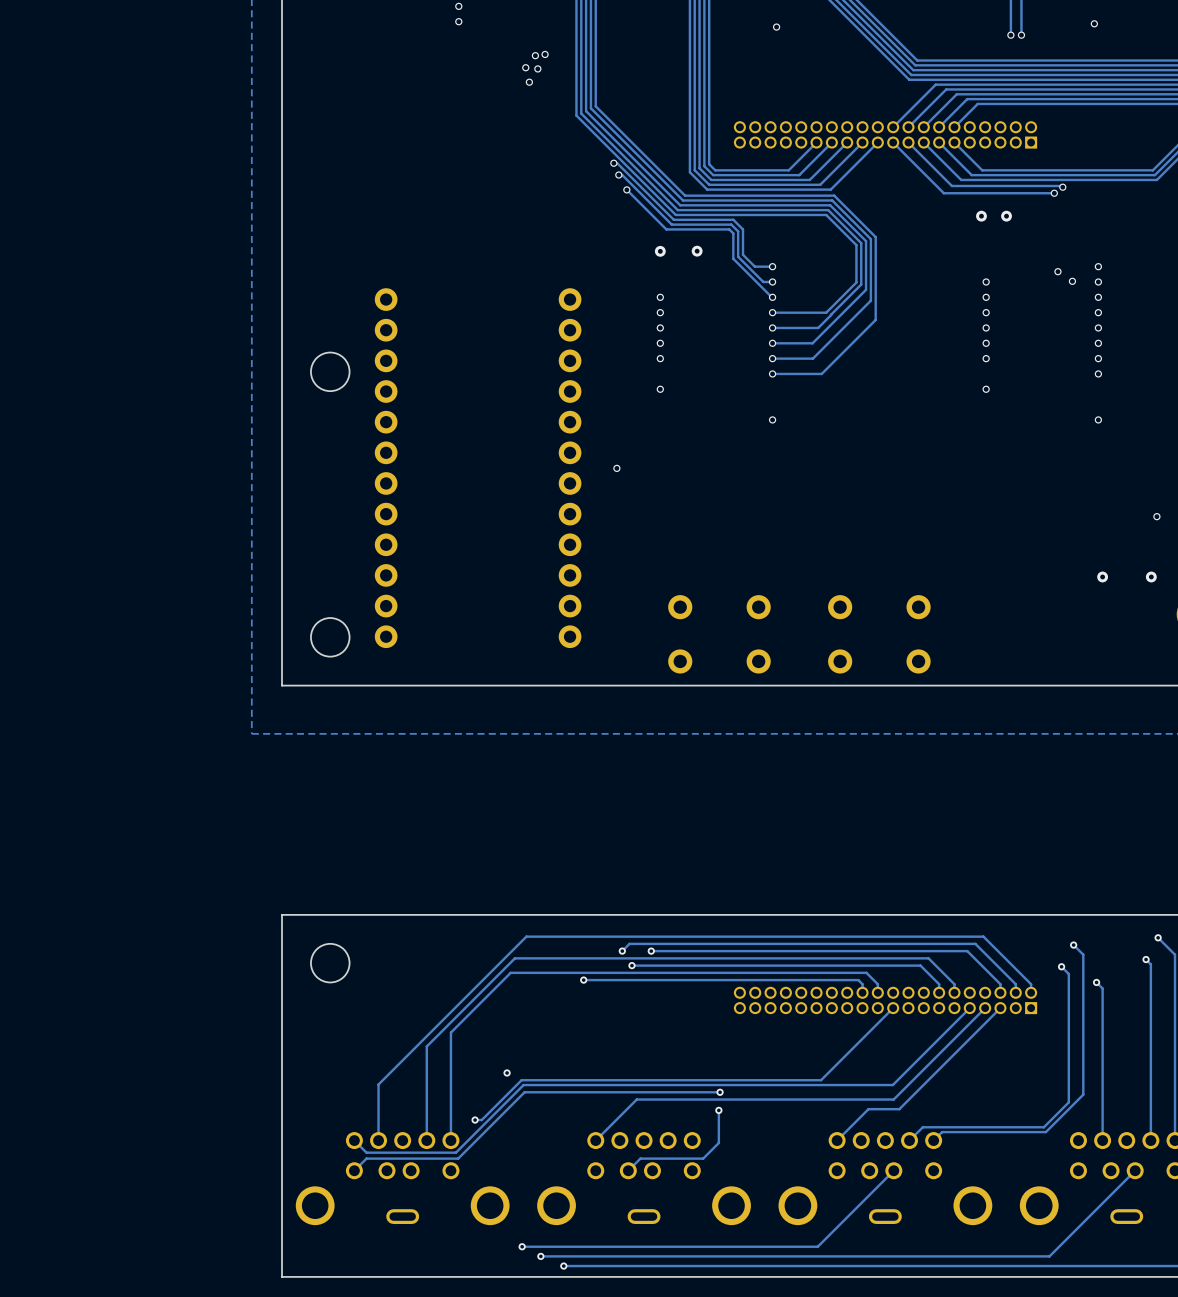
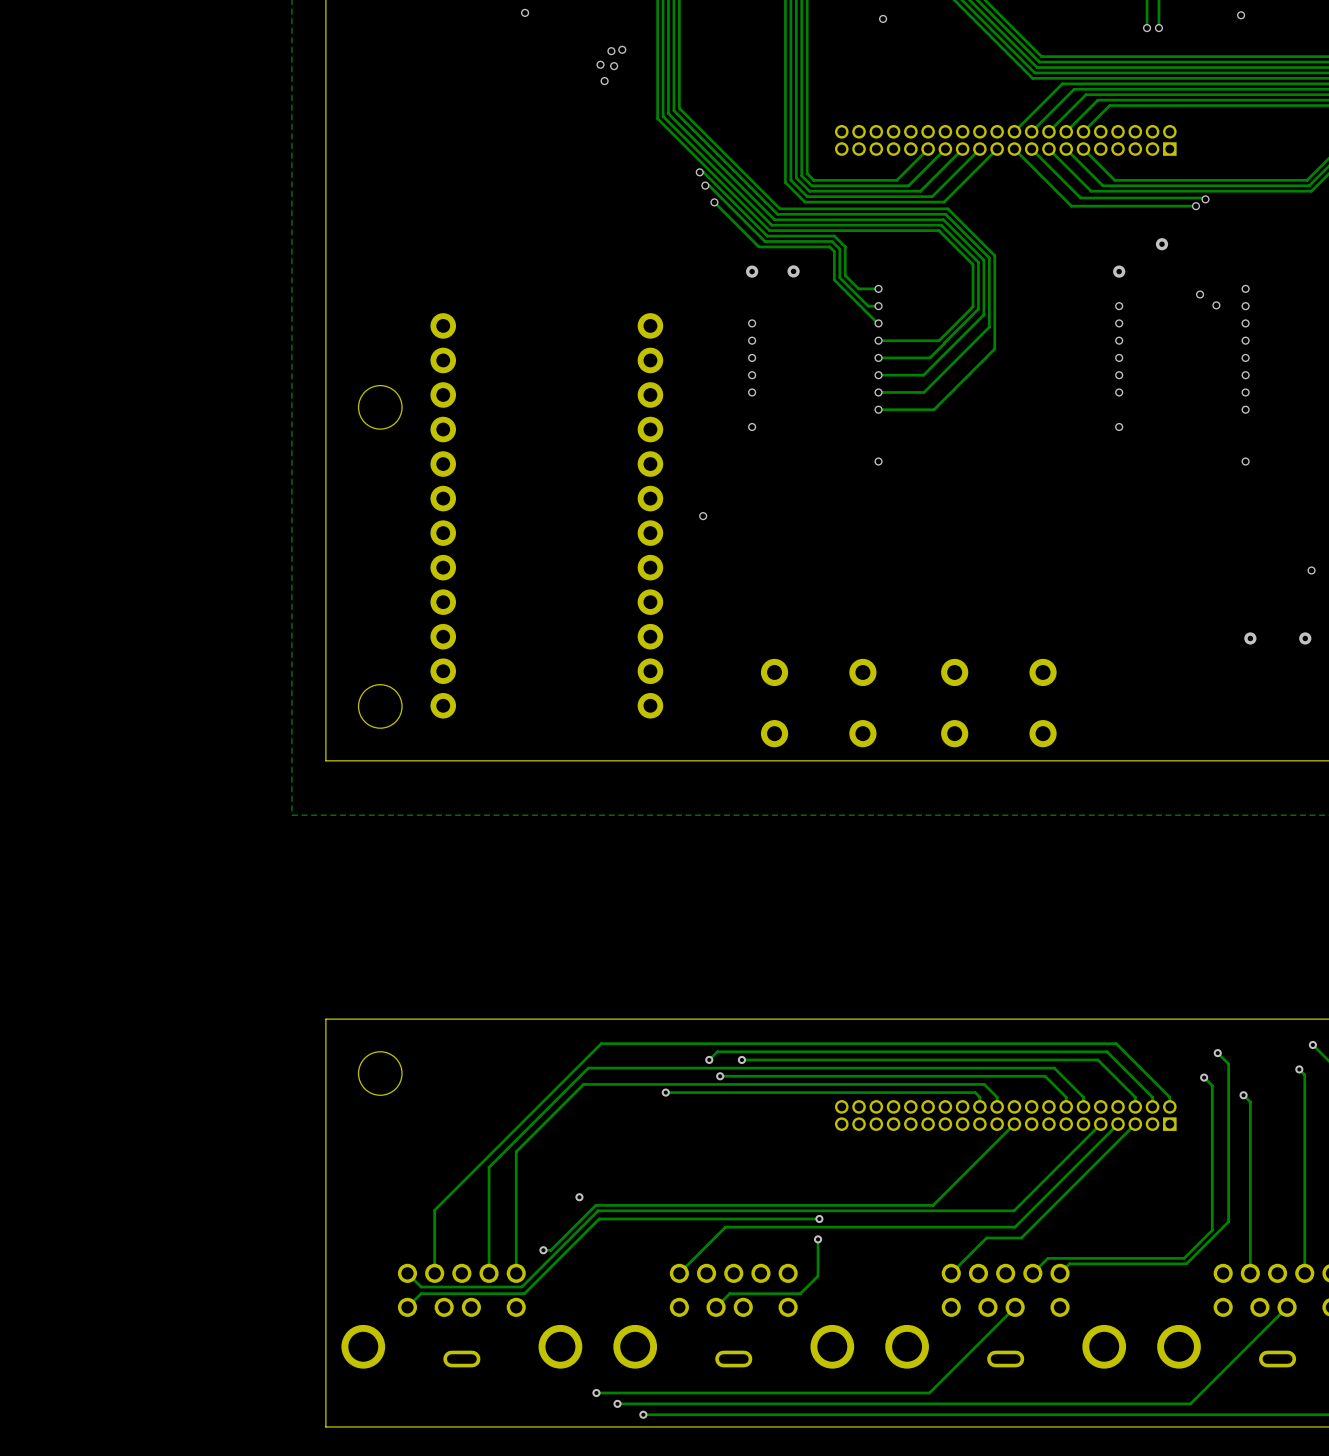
via: (981, 216) -> none
via: (1006, 216) -> none
via: none -> (1162, 244)
via: none -> (1119, 271)

